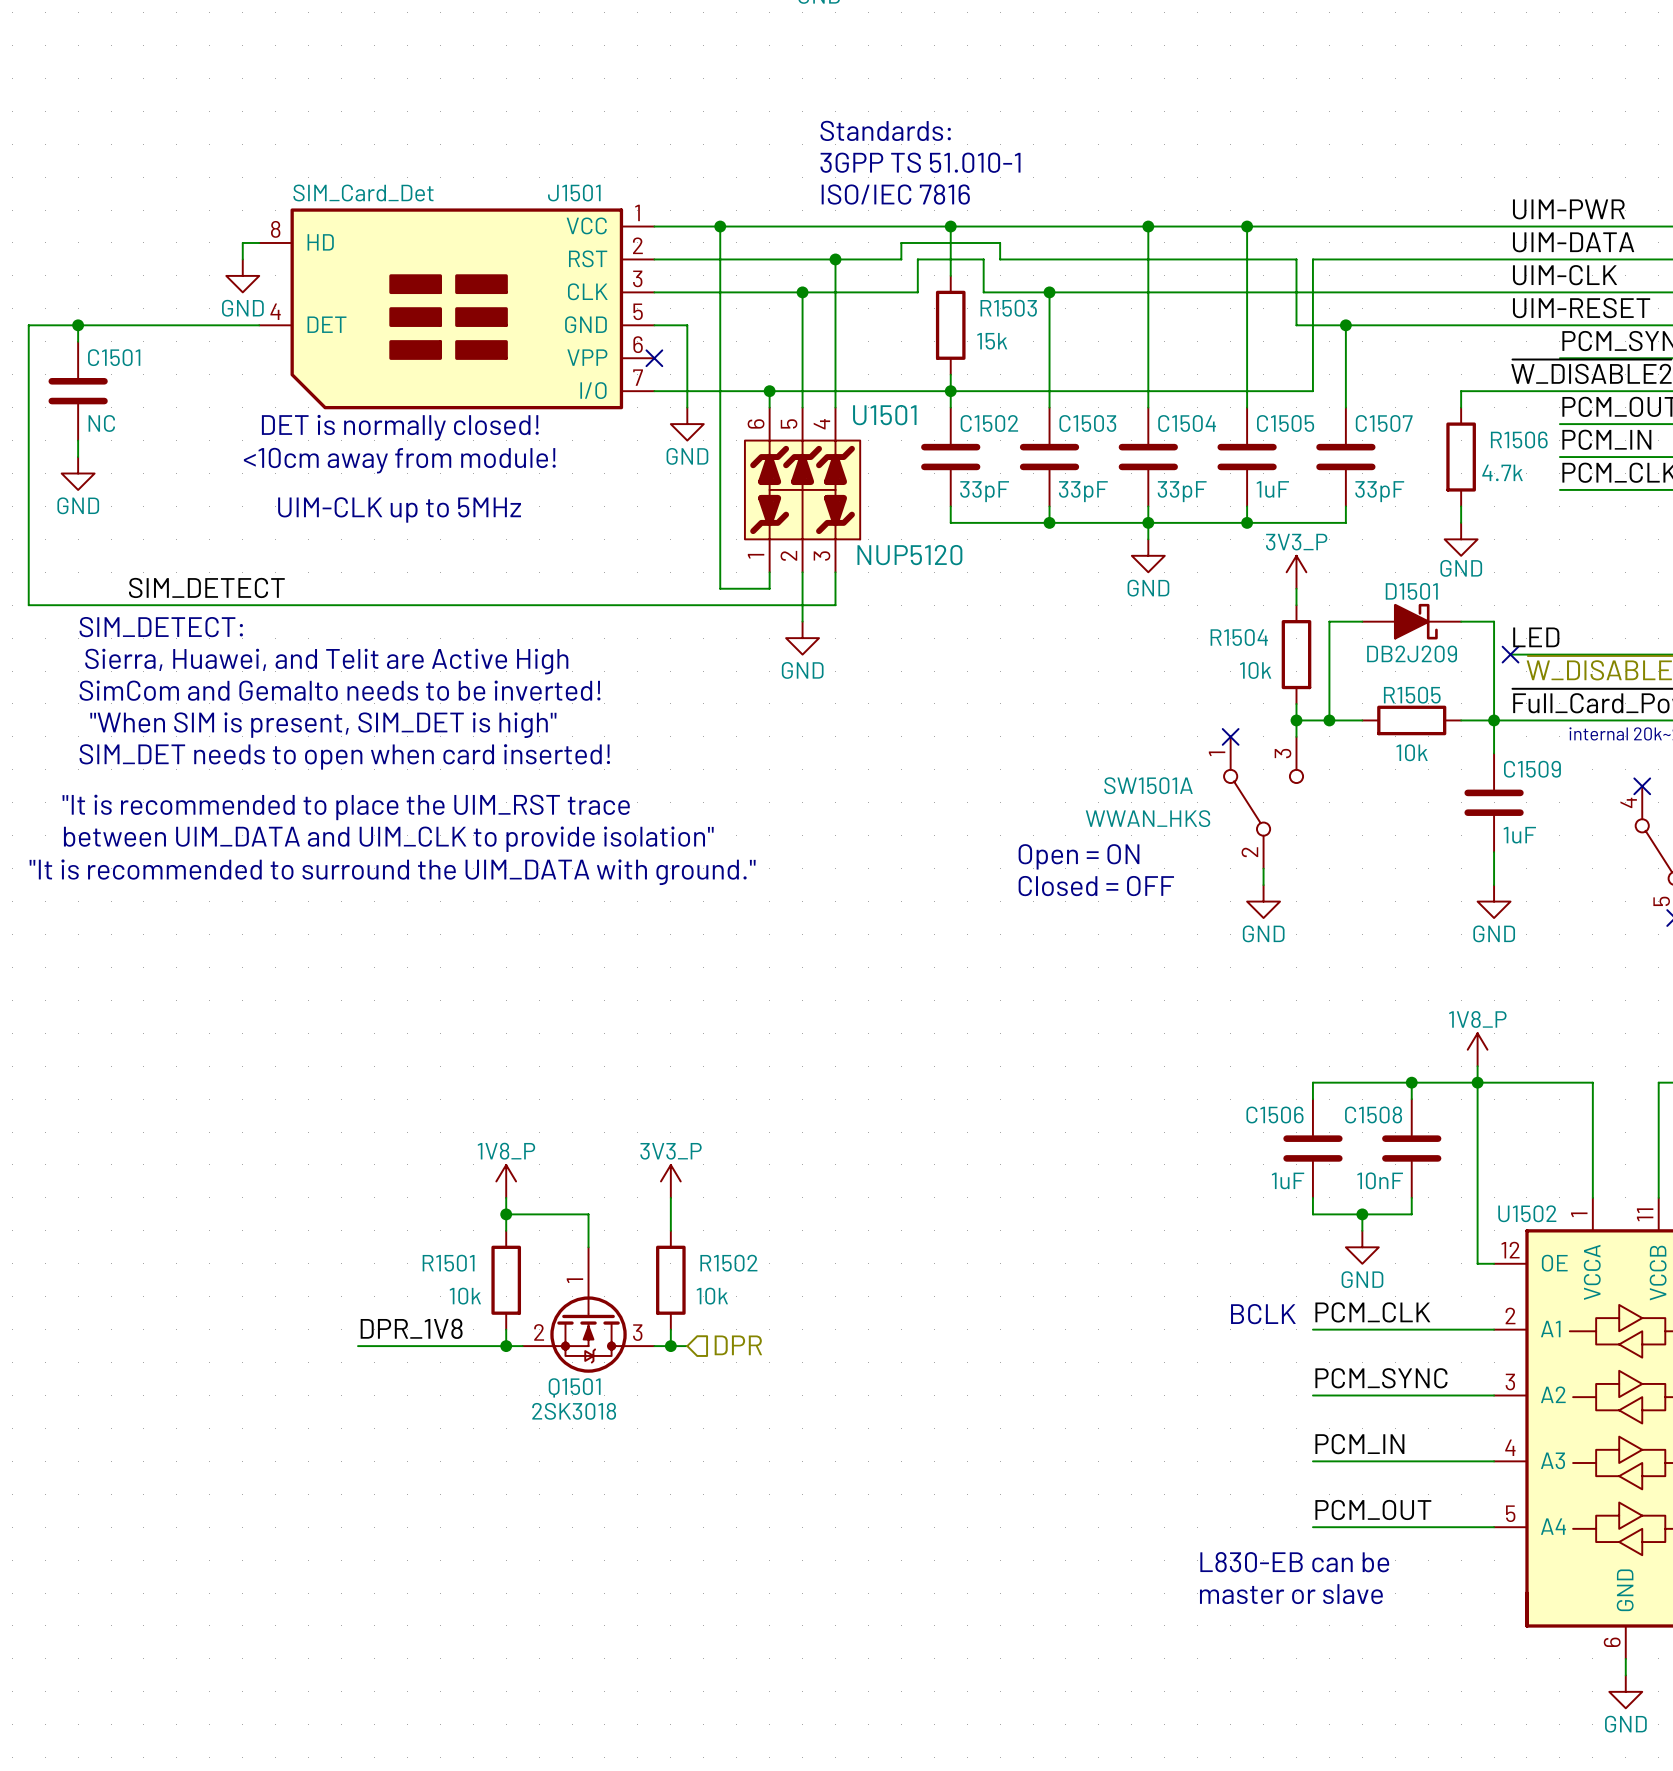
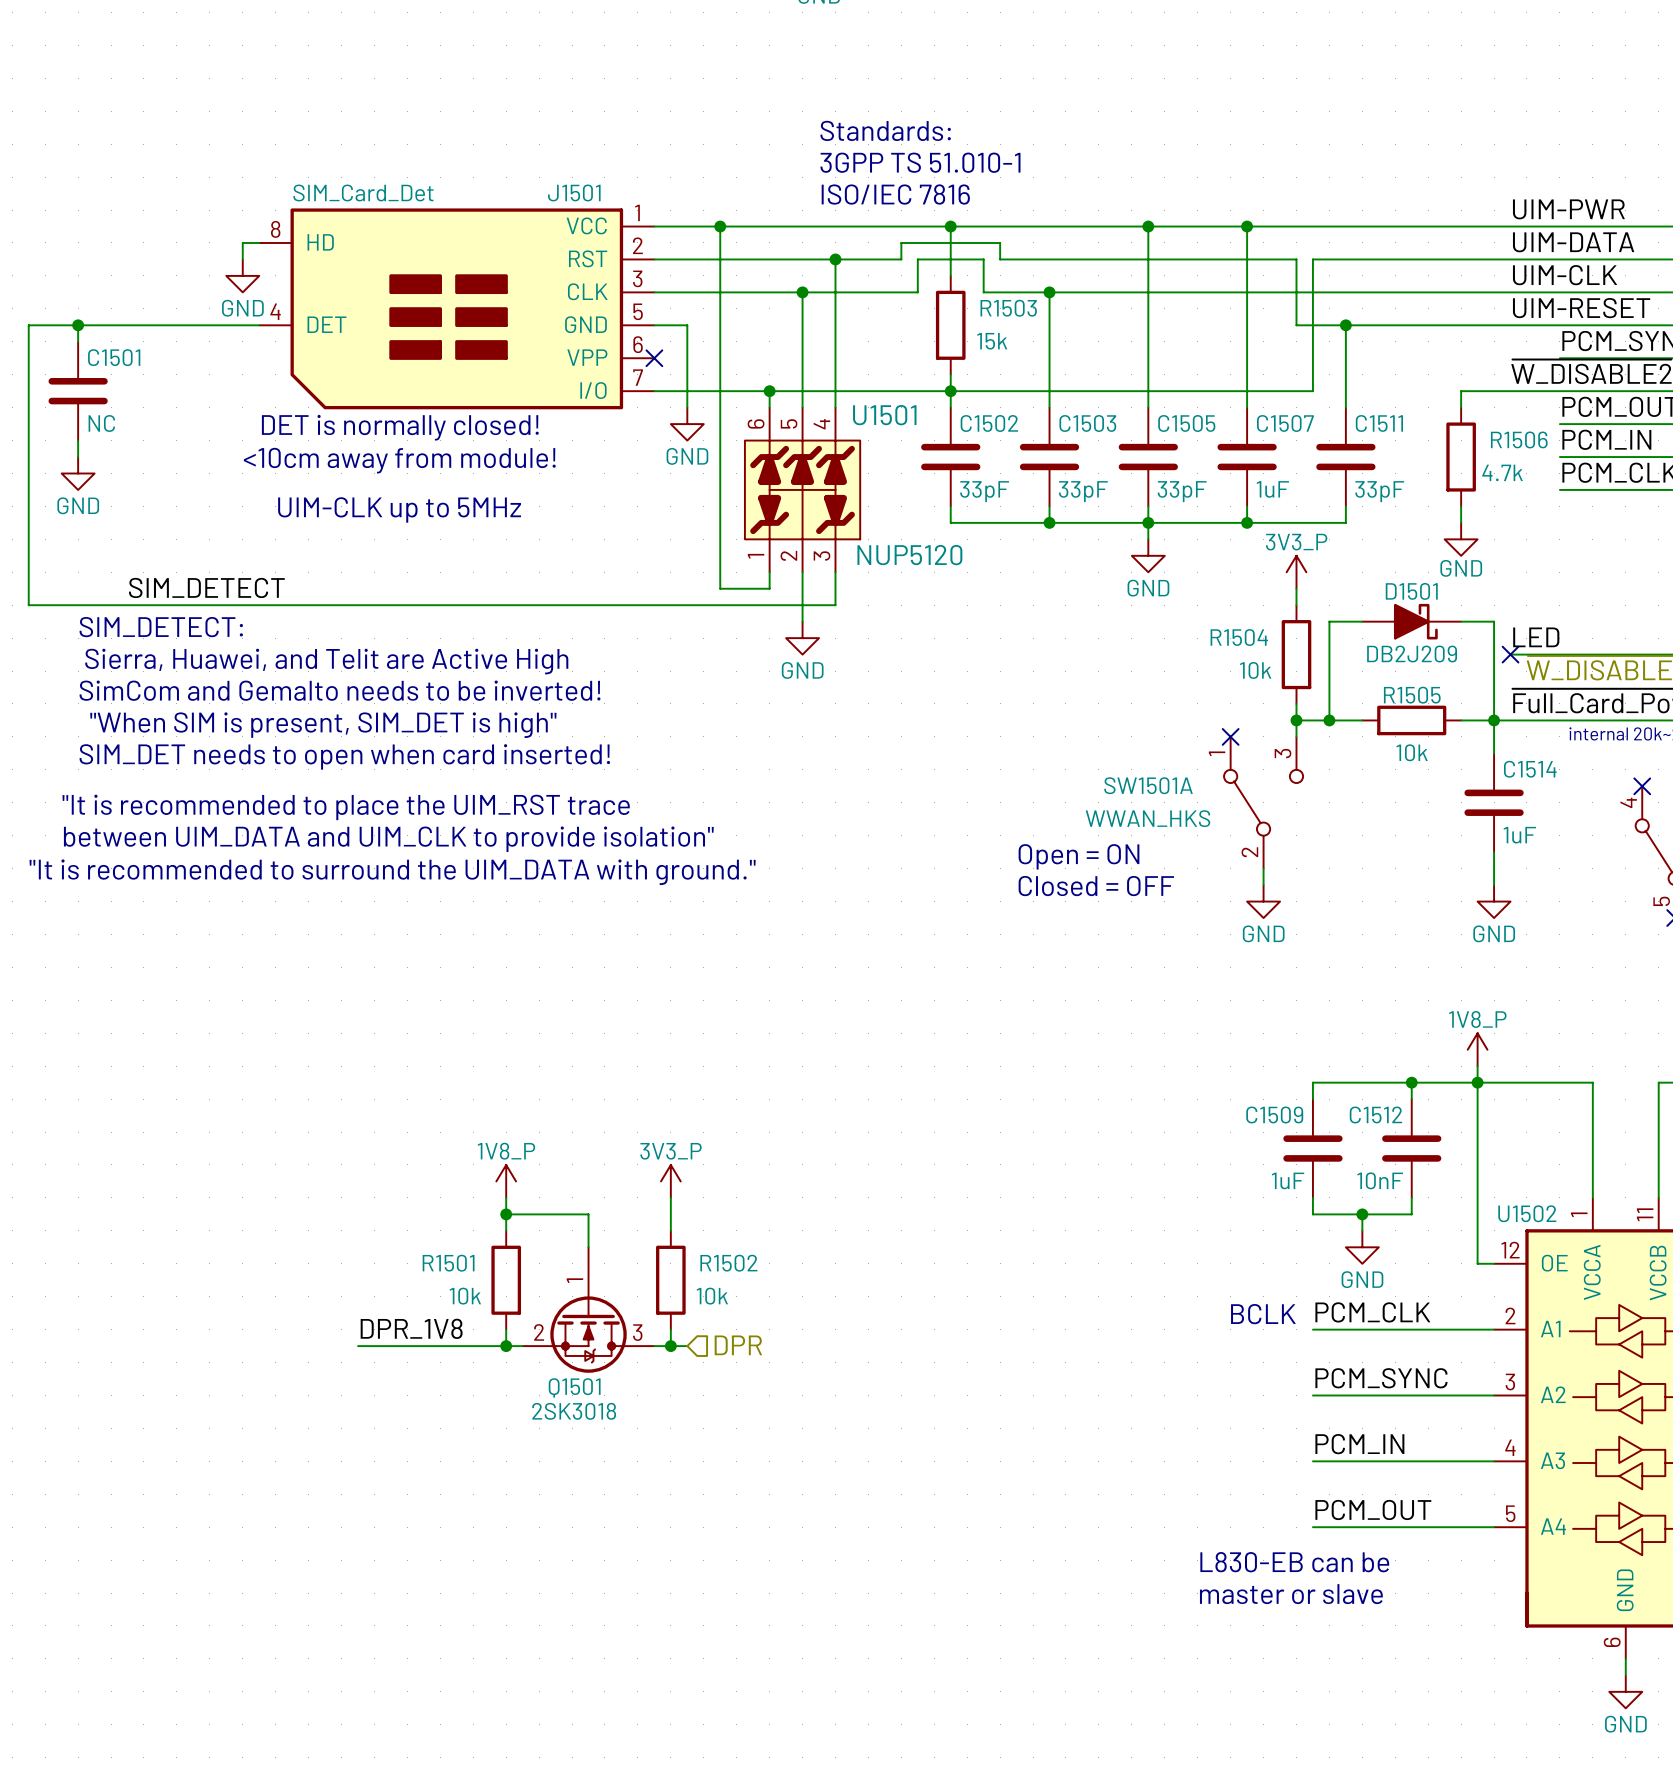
C1504 name: C1504 (1187, 423) -> C1505 (1186, 423)
C1505 name: C1505 (1285, 423) -> C1507 (1285, 423)
C1507 name: C1507 (1384, 423) -> C1511 (1379, 423)
C1509 name: C1509 (1532, 769) -> C1514 (1530, 769)
C1506 name: C1506 (1274, 1114) -> C1509 (1274, 1114)
C1508 name: C1508 (1373, 1114) -> C1512 (1375, 1115)

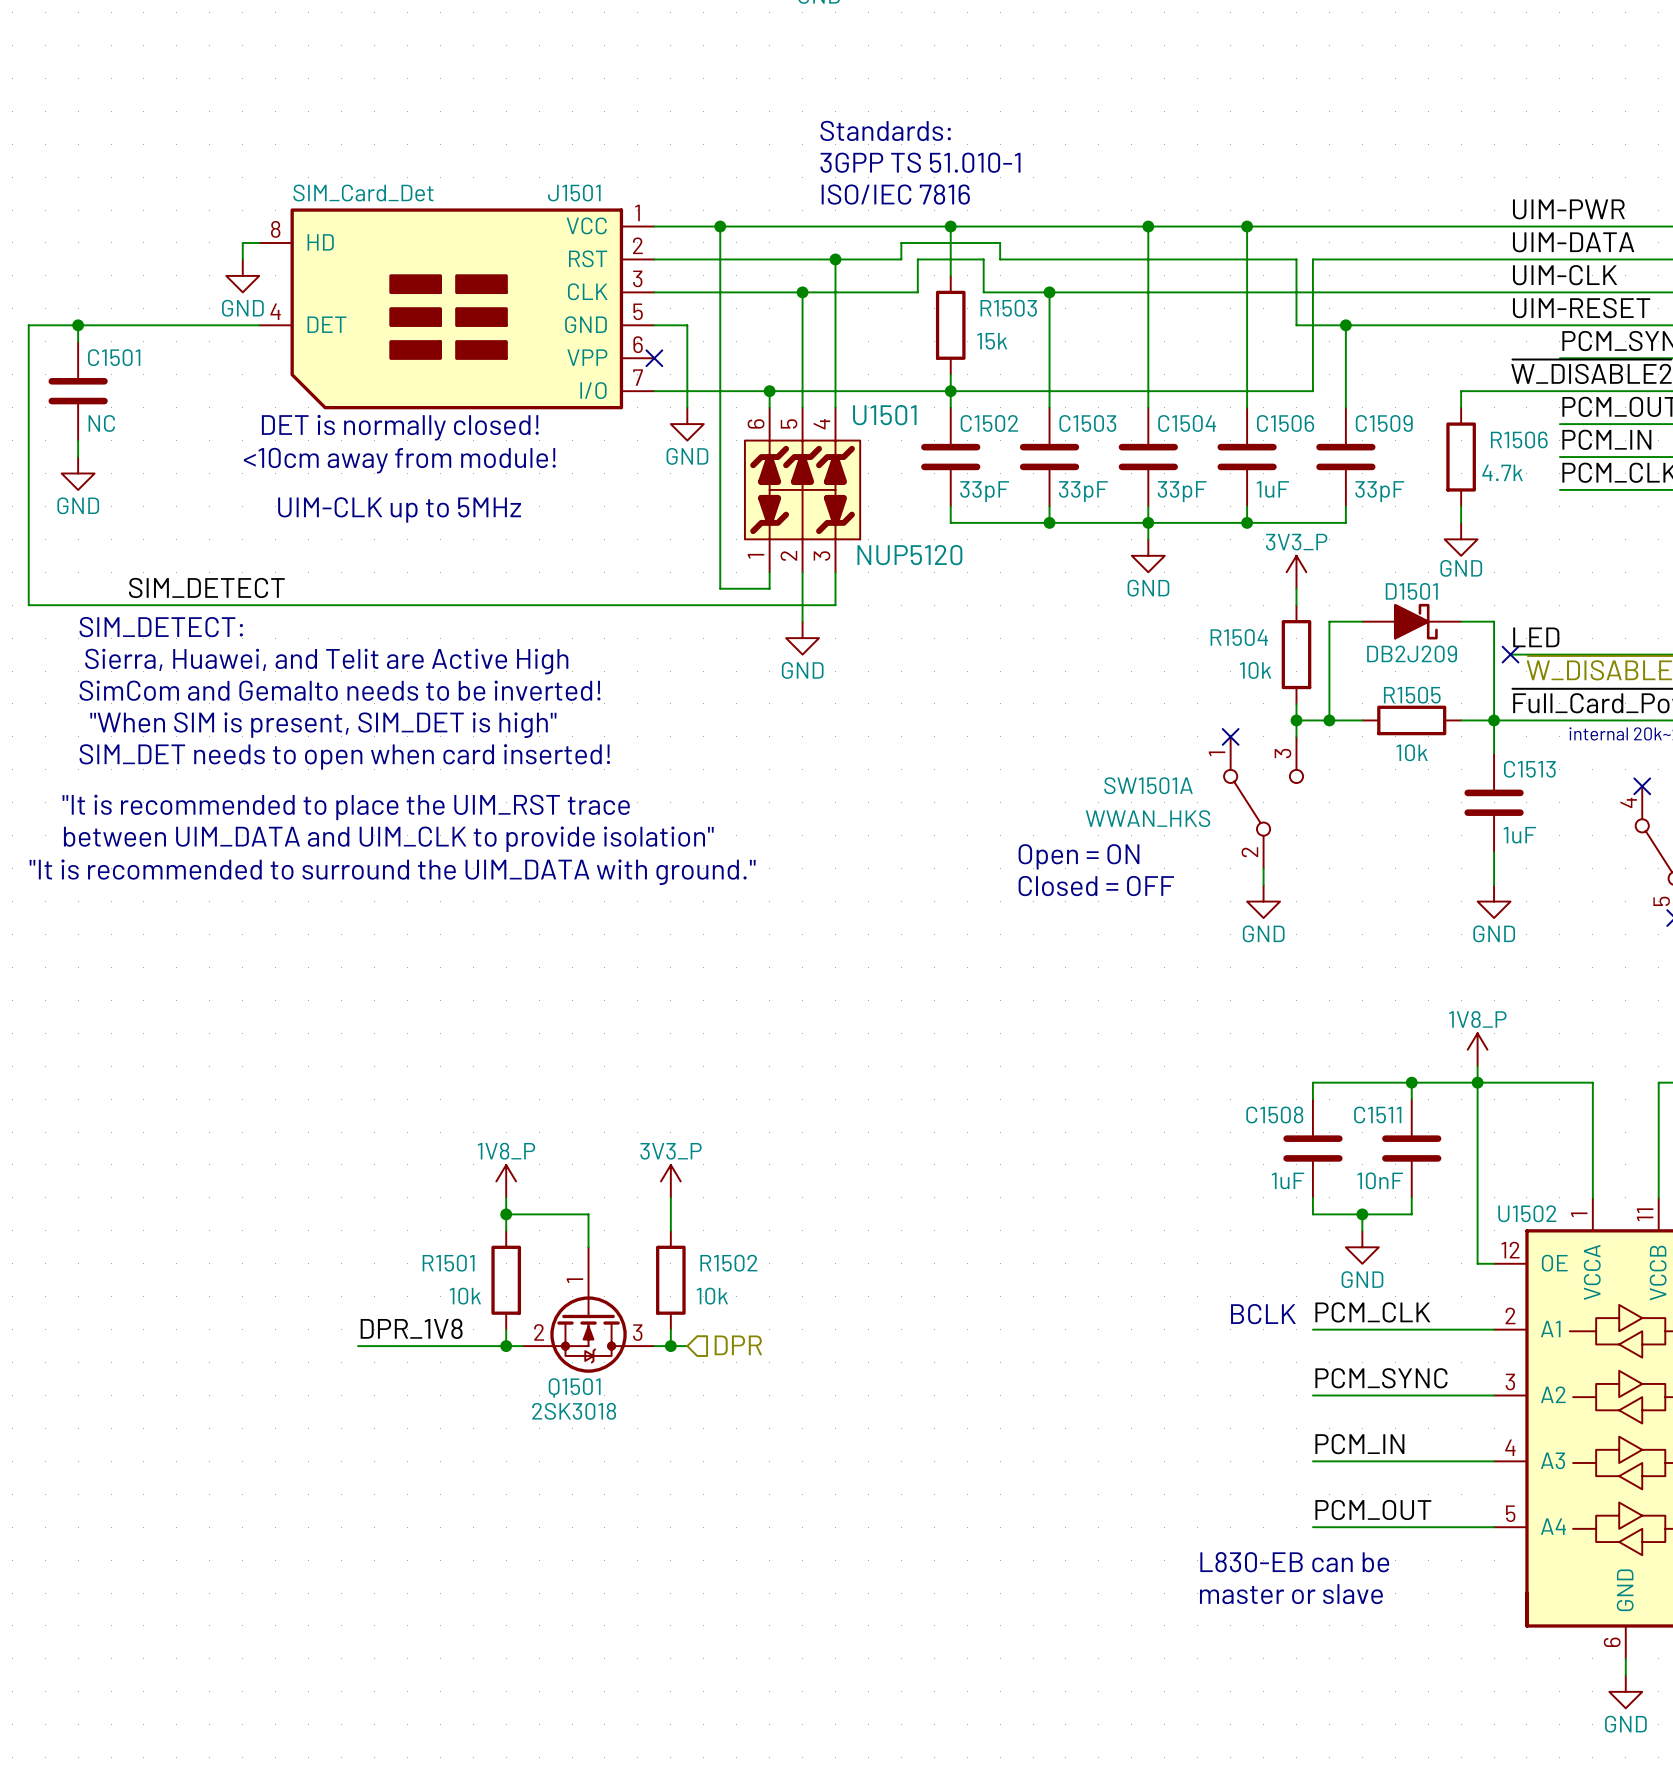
C1505 name: C1505 (1186, 423) -> C1504 (1187, 423)
C1507 name: C1507 (1285, 423) -> C1506 (1285, 423)
C1511 name: C1511 (1379, 423) -> C1509 (1384, 423)
C1514 name: C1514 (1530, 769) -> C1513 (1529, 769)
C1509 name: C1509 (1274, 1114) -> C1508 (1274, 1114)
C1512 name: C1512 (1375, 1115) -> C1511 (1377, 1115)

